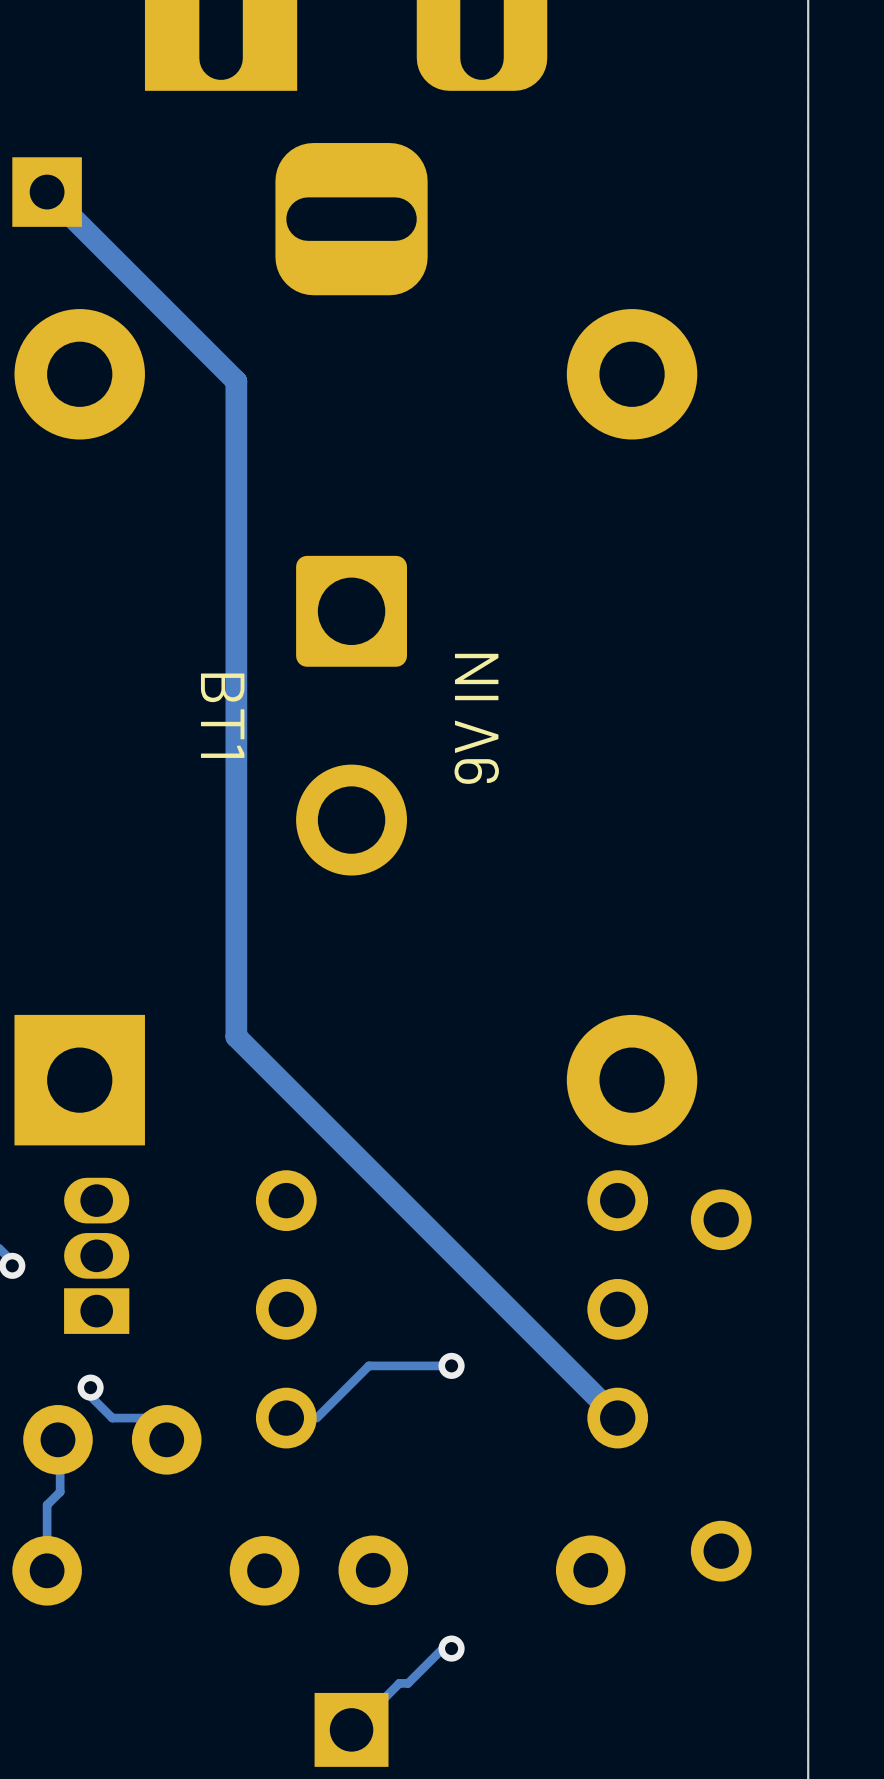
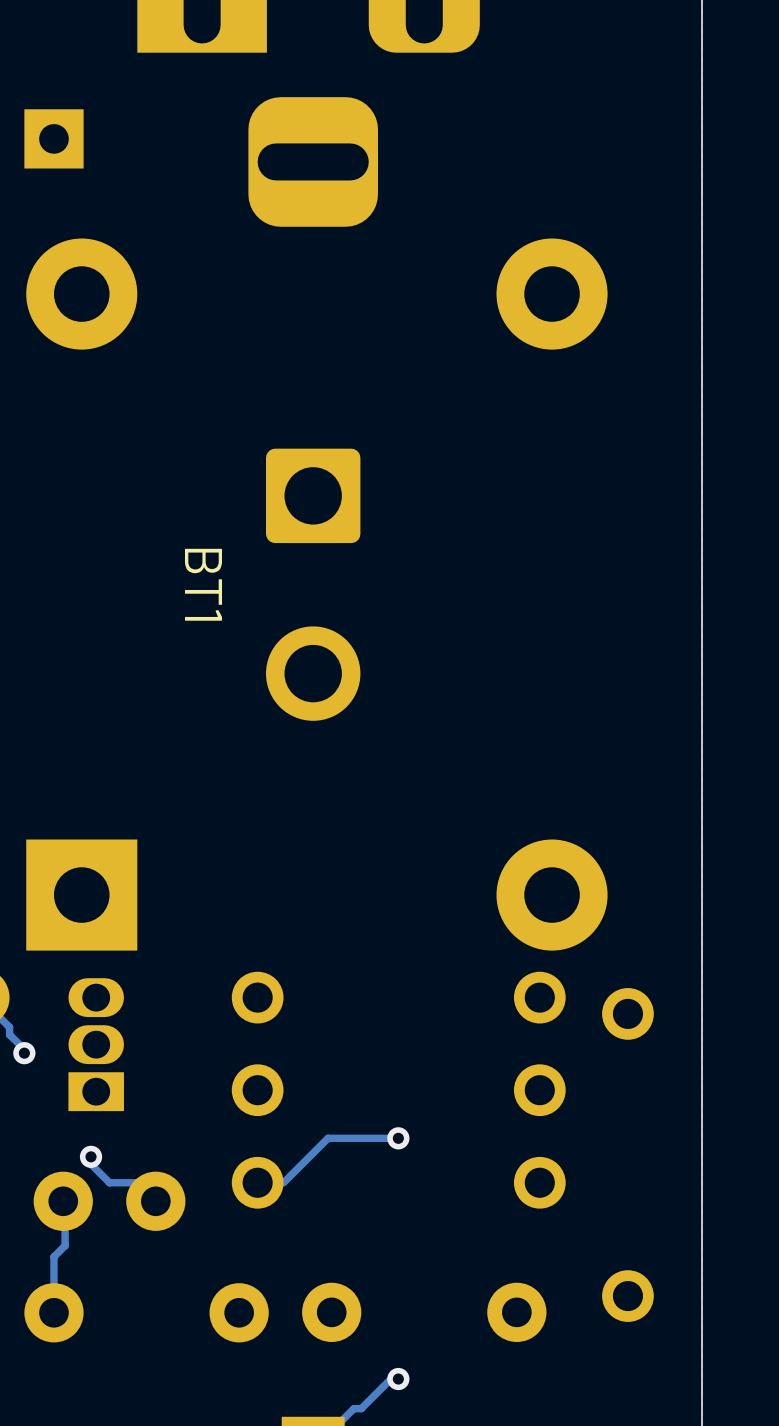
track: (47, 192) (236, 381) (236, 1036) (617, 1418) -> none
text: 9V IN (476, 718) -> none

